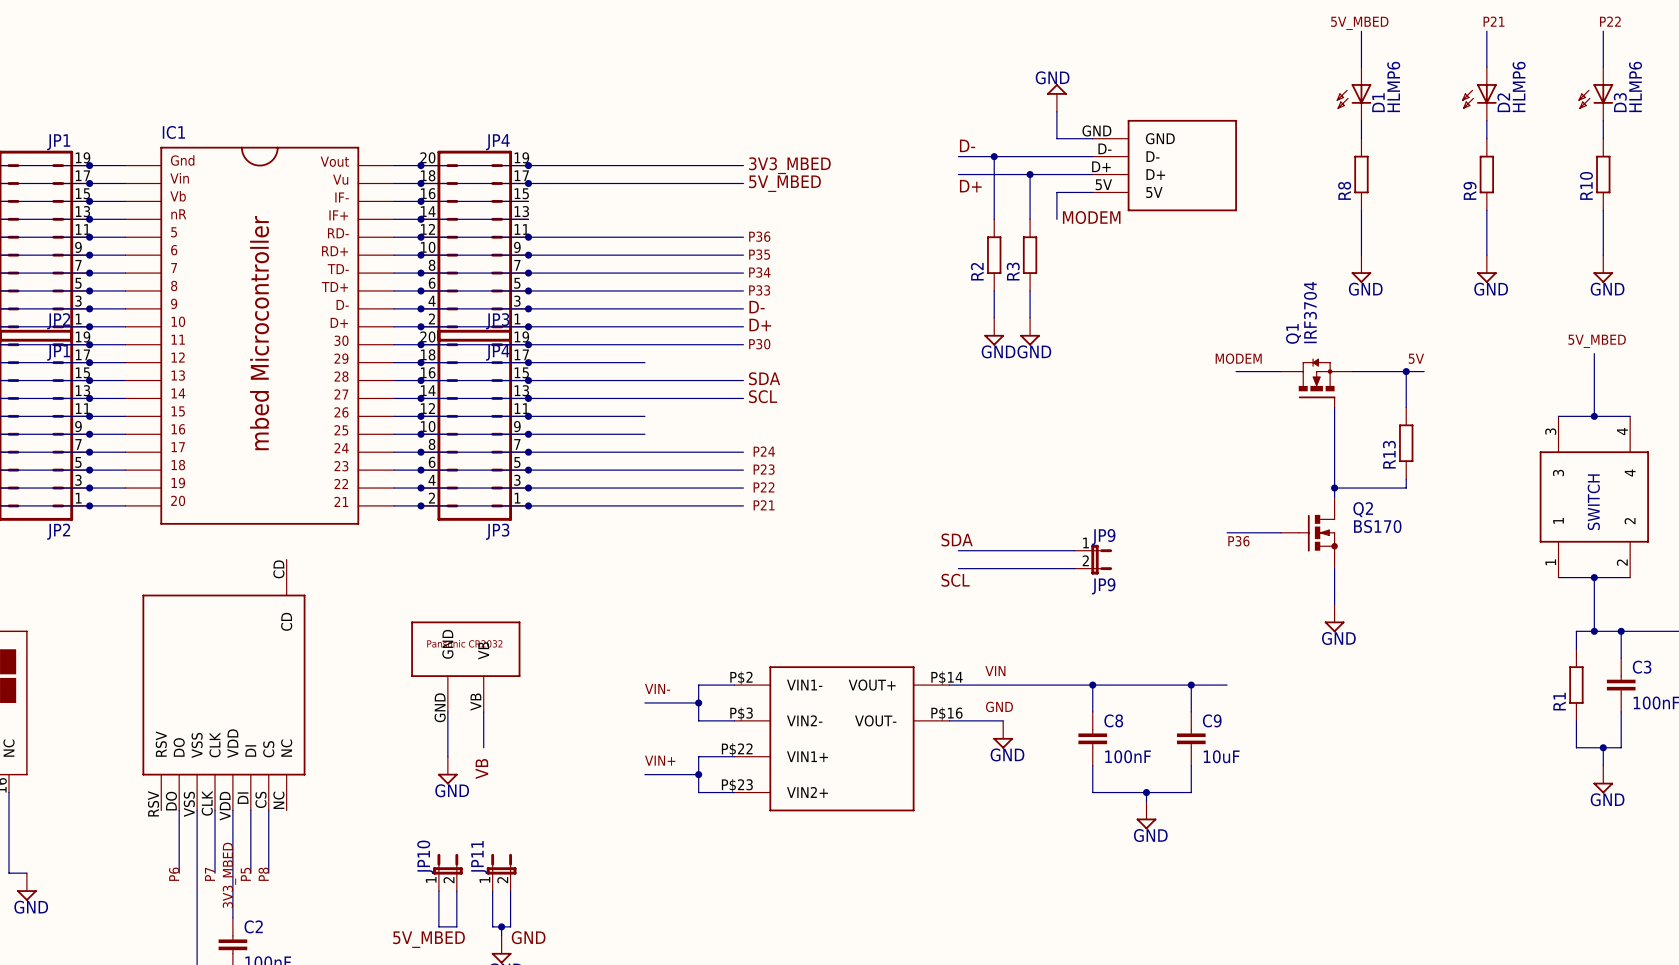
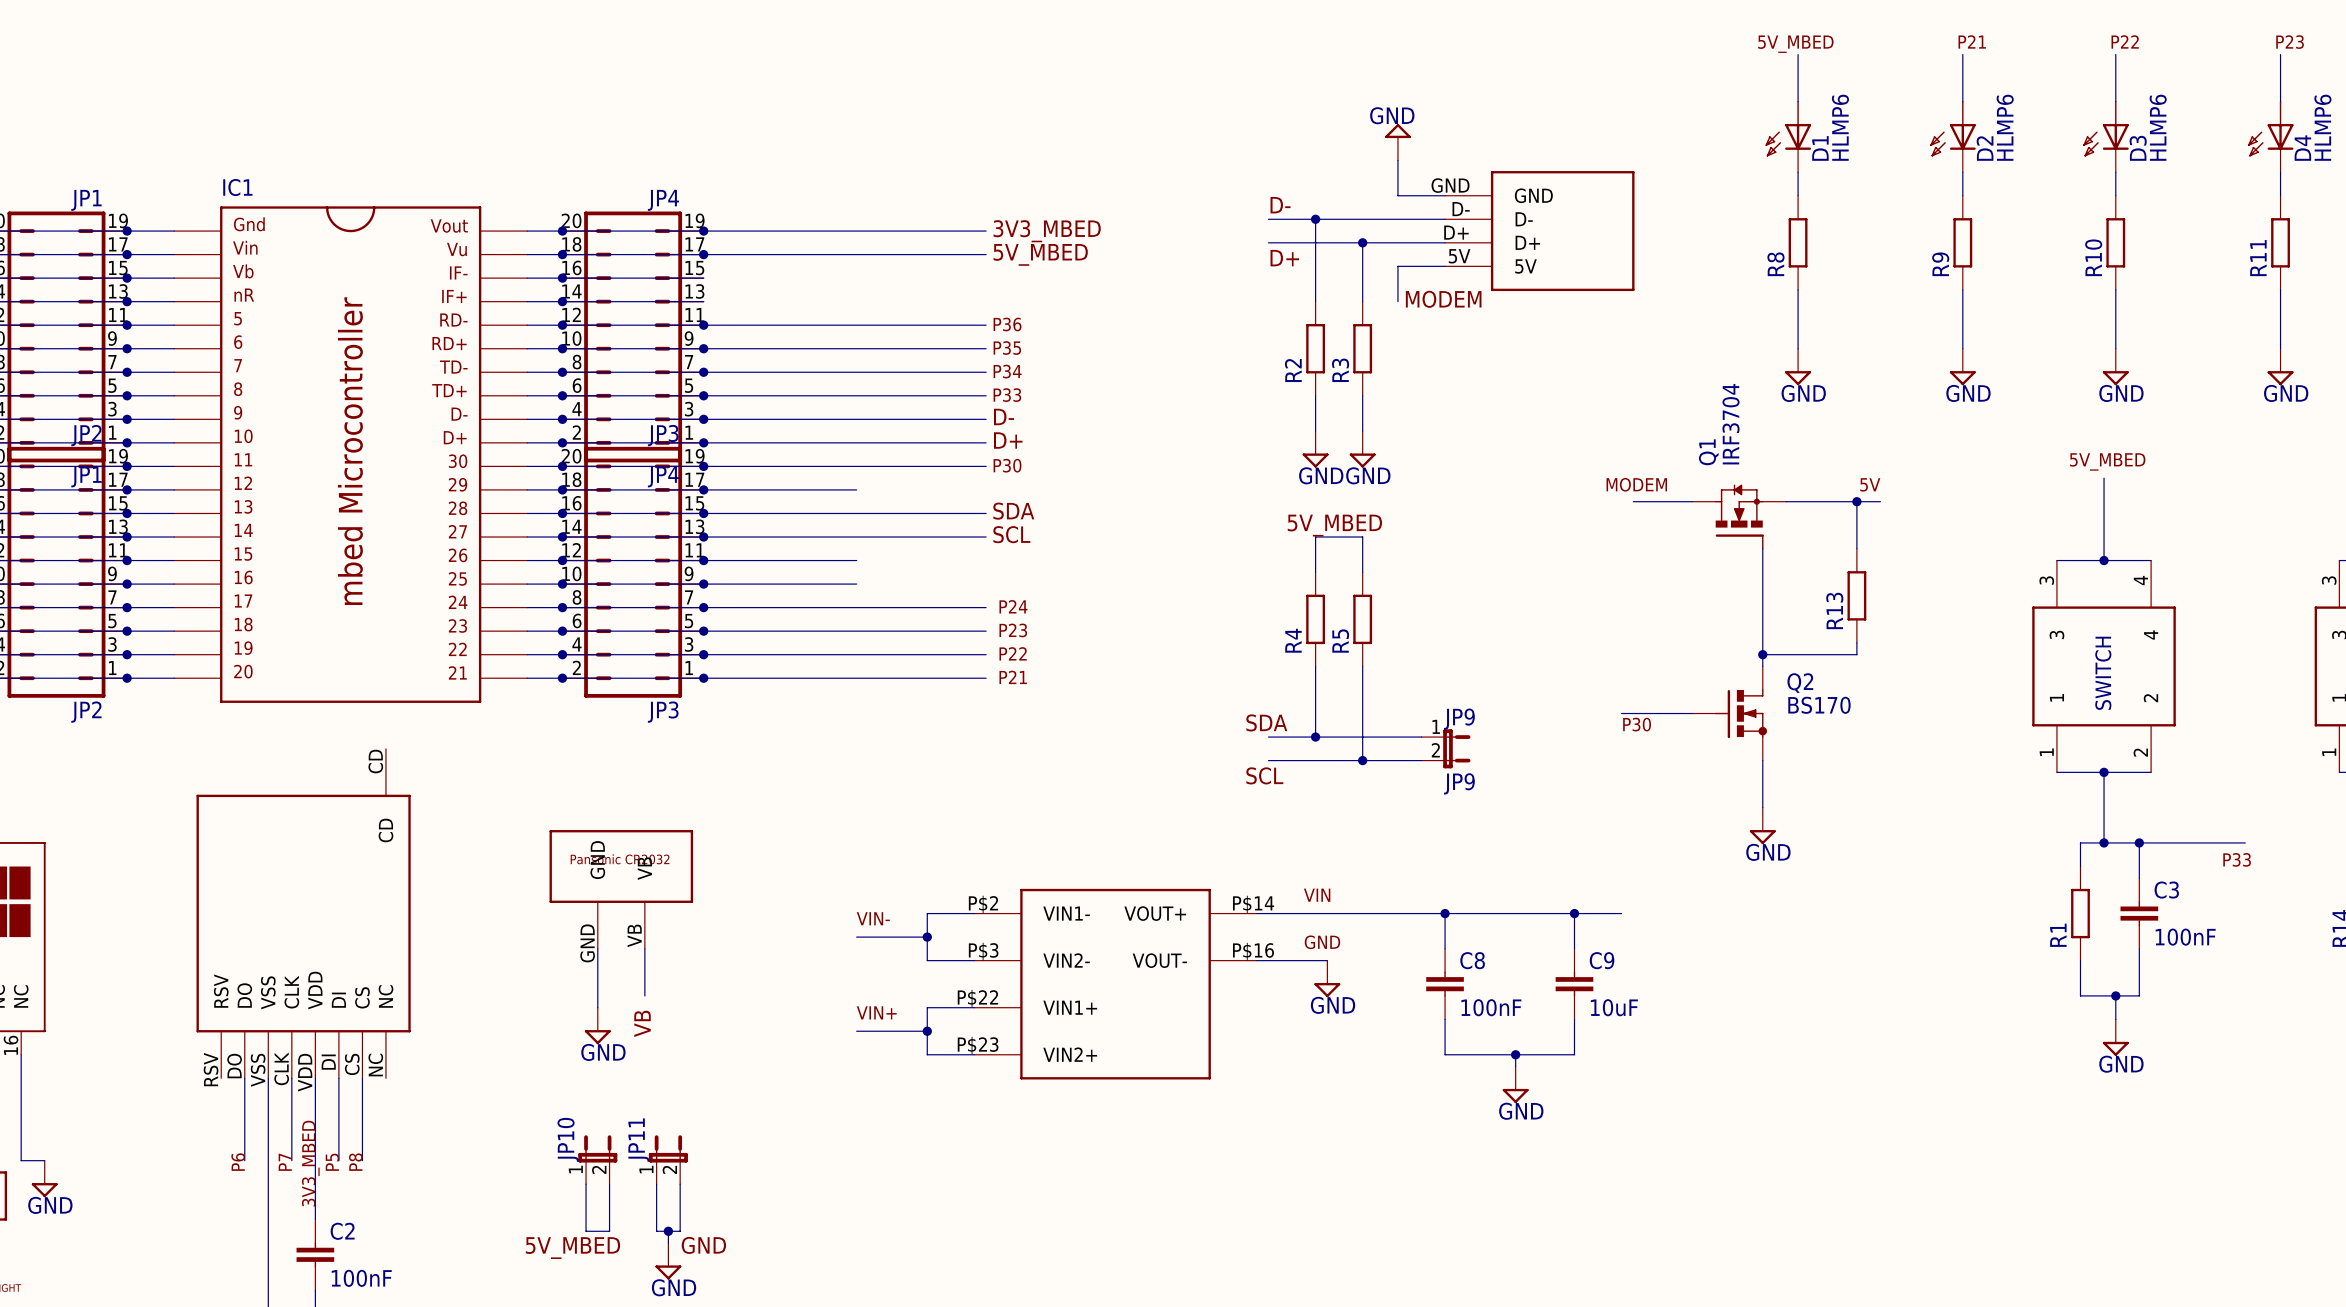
label: none -> 5V_MBED (1334, 525)
wire: none -> (1315, 572) (1315, 537) (1362, 537) (1362, 572)
R4: none -> (1315, 619)
R5: none -> (1362, 619)
wire: none -> (1315, 666) (1315, 737)
wire: none -> (1362, 666) (1362, 760)
label: P36 (1238, 541) -> P30 (1637, 724)
junction: none -> (1315, 737)
junction: none -> (1362, 760)

